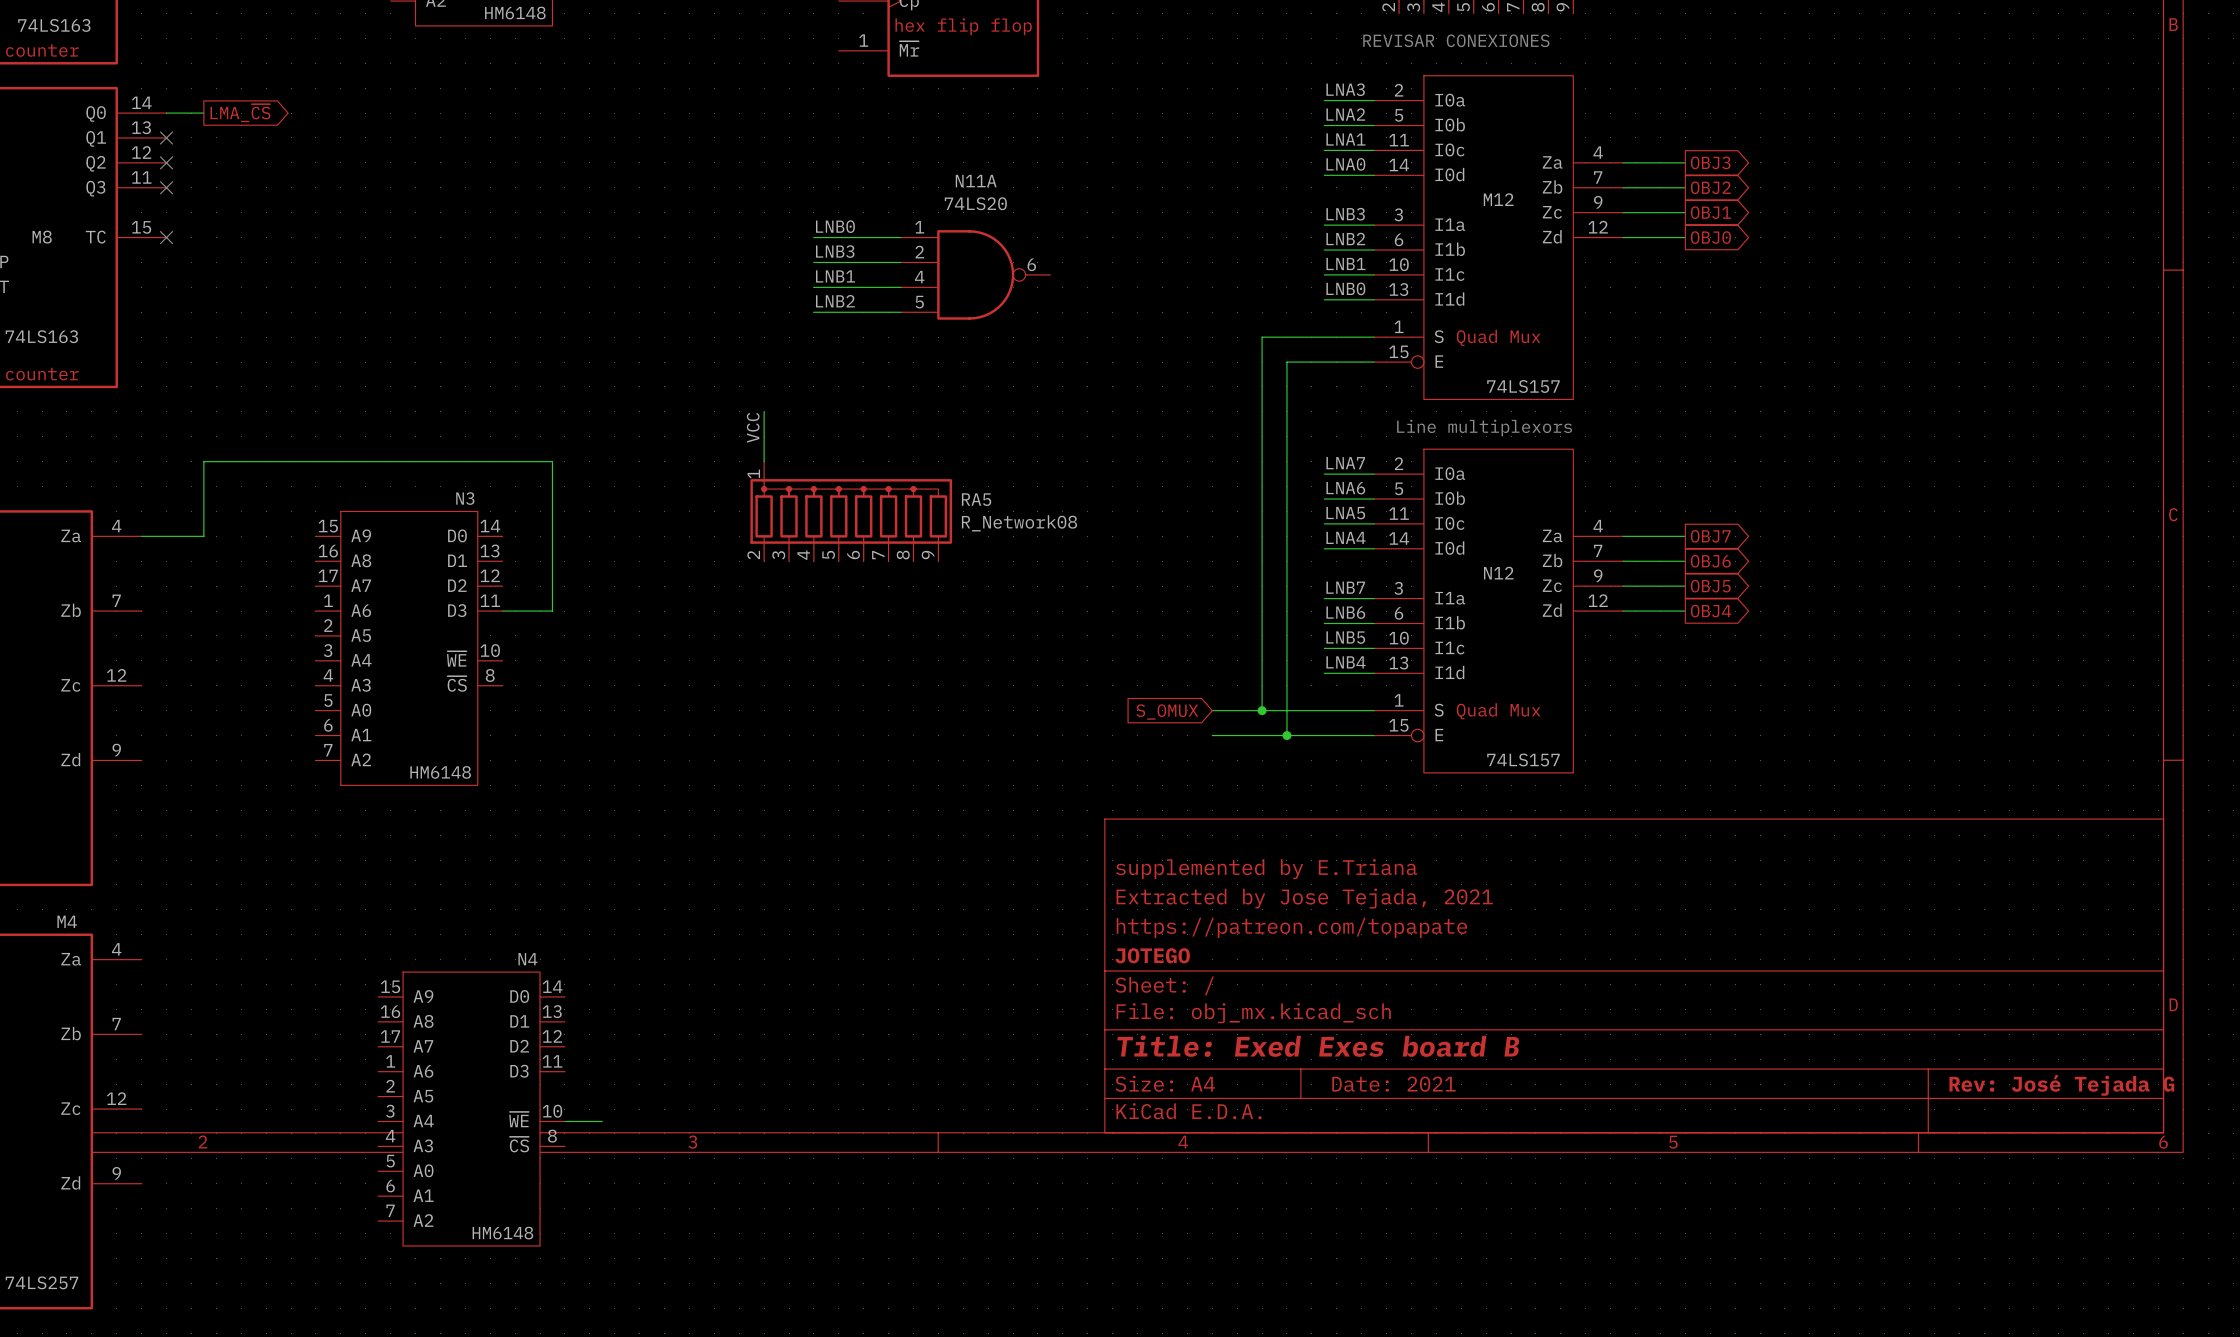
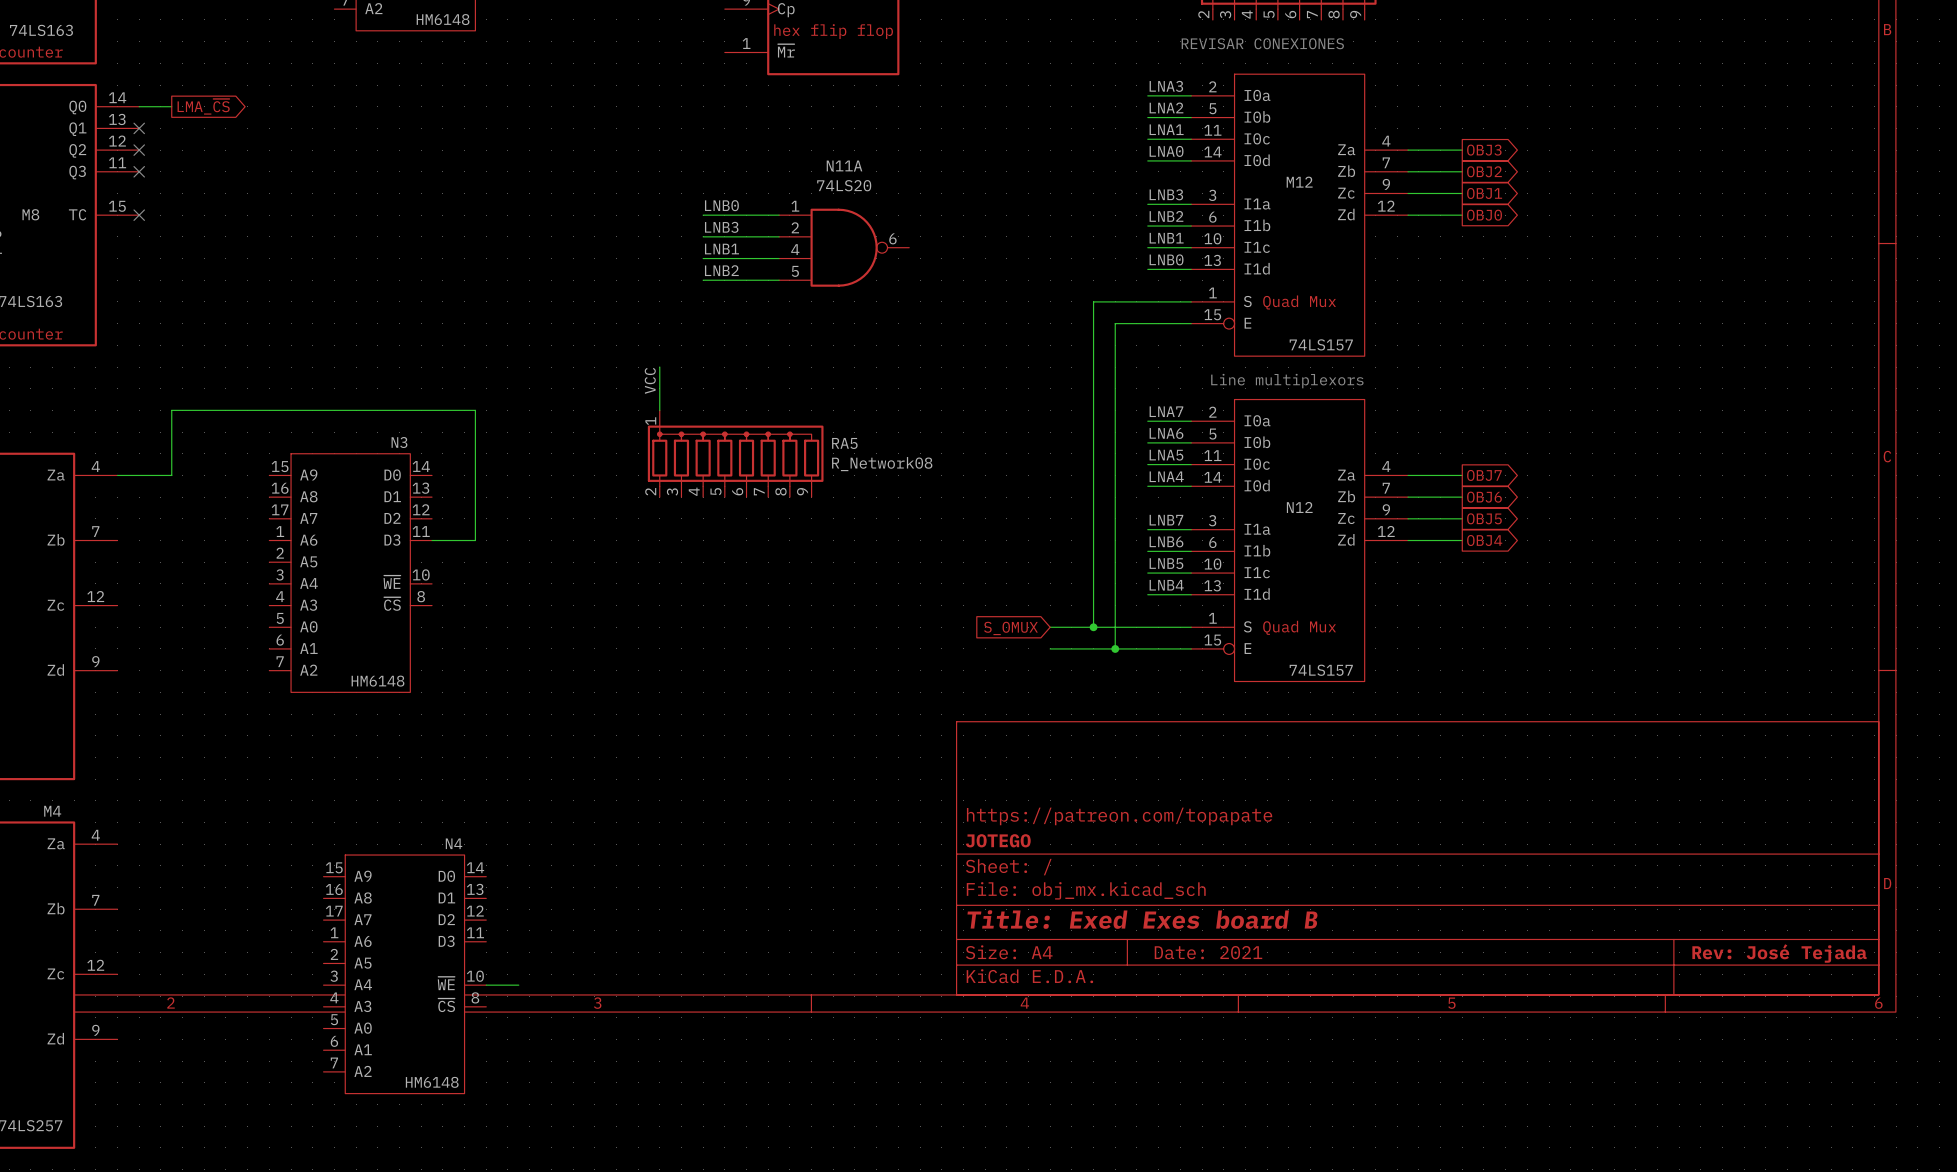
title block: supplemented by E.Triana (1266, 869) -> none
title block: Extracted by Jose Tejada, 2021 (1304, 898) -> none
title block: Rev: José Tejada G (2061, 1085) -> Rev: José Tejada (1779, 953)

